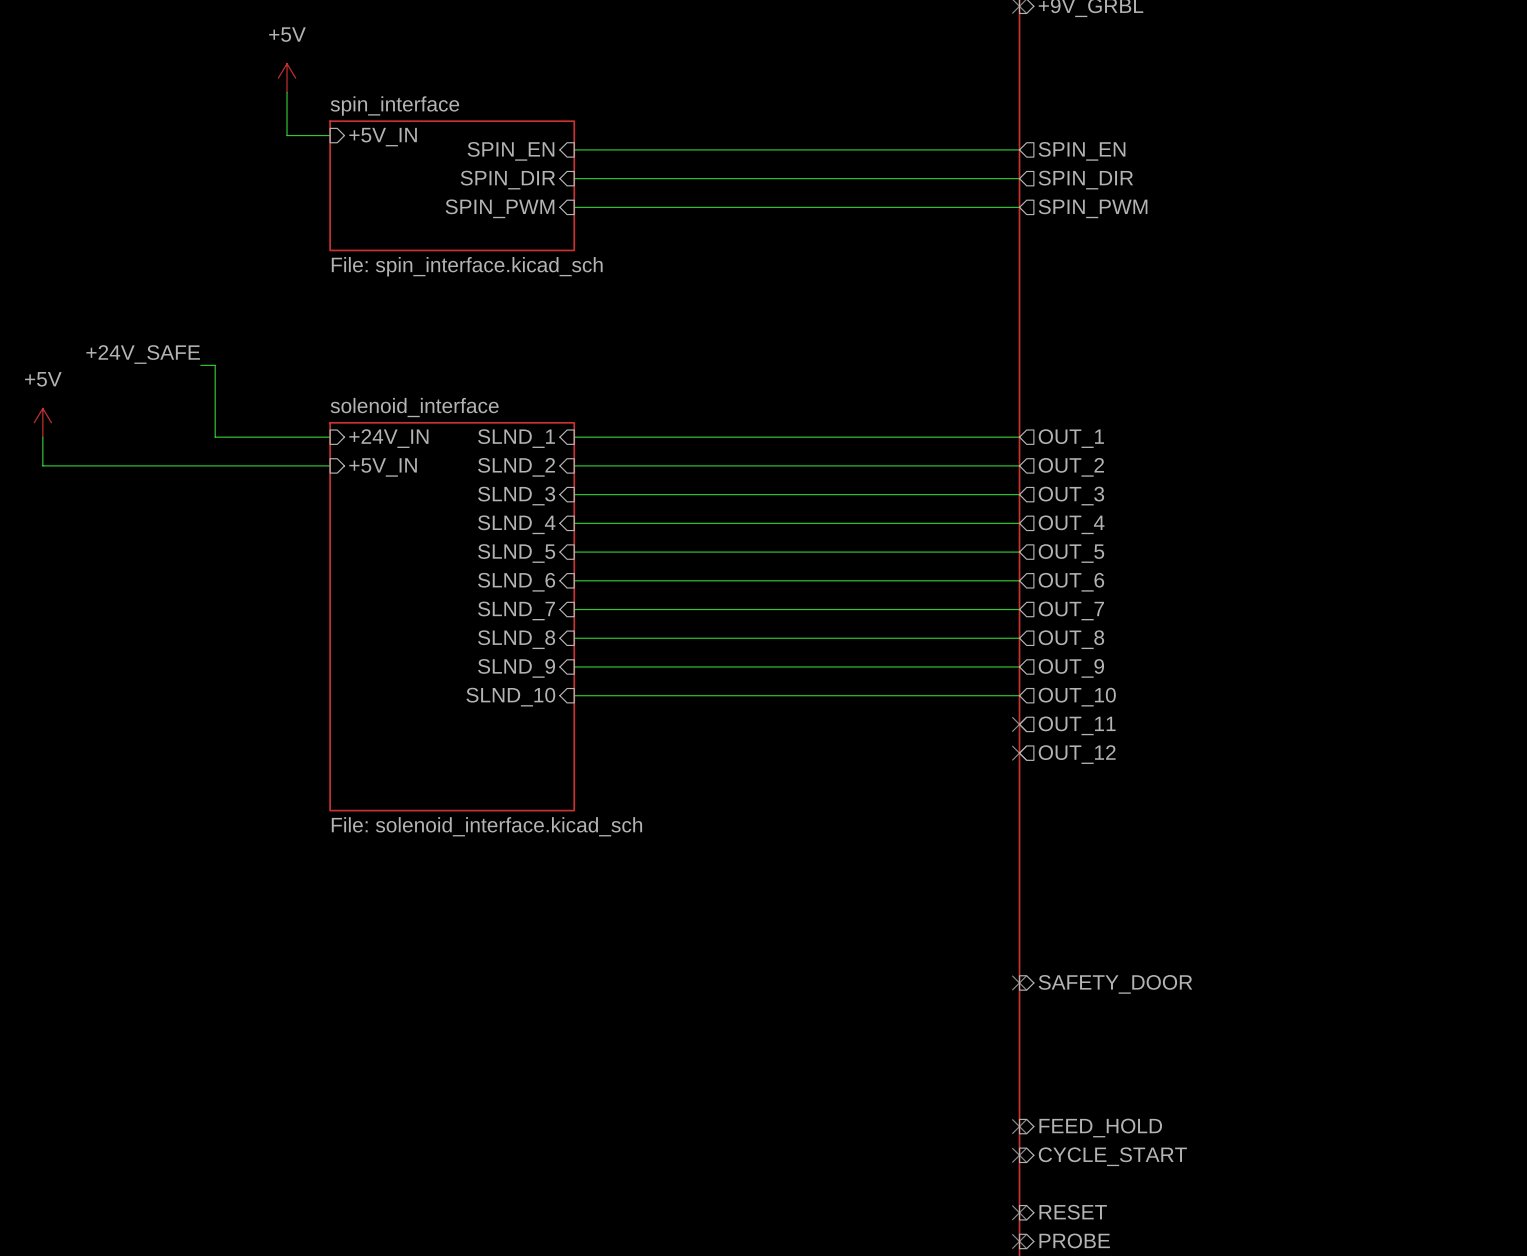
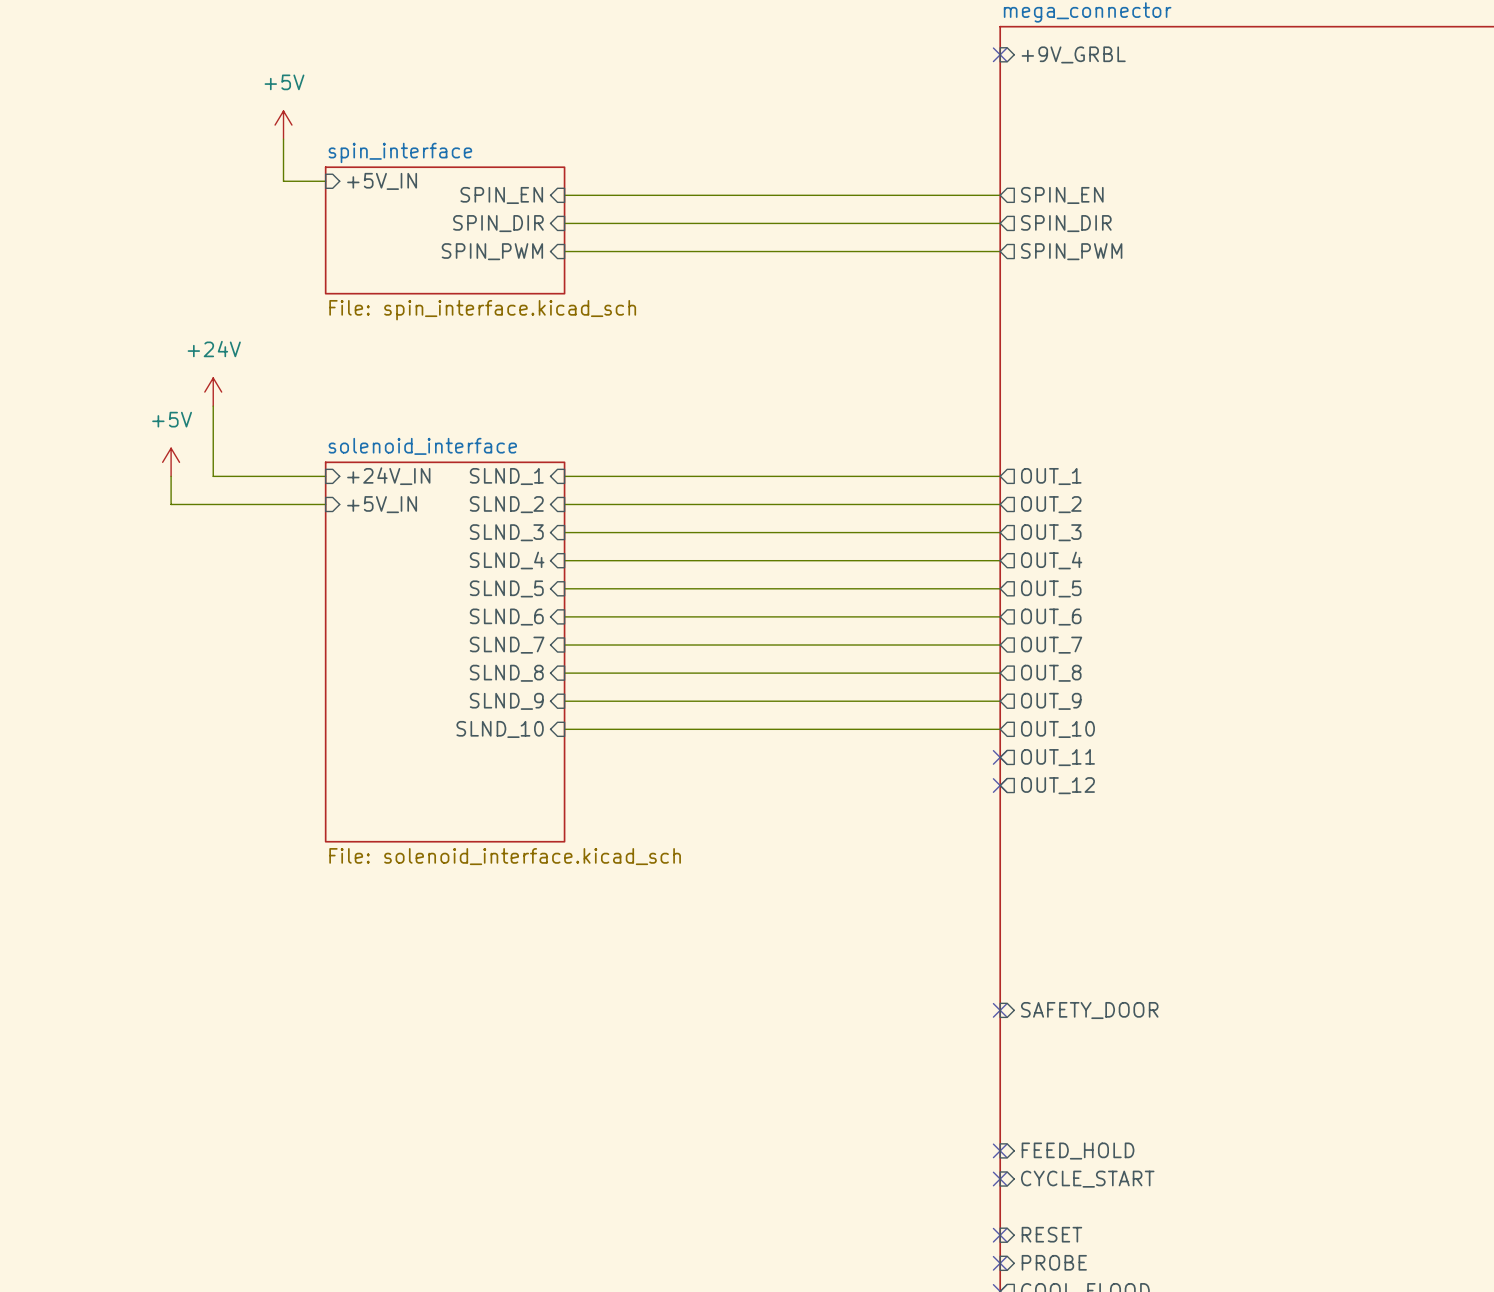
power symbol: none -> +24V (213, 392)
label: +24V_SAFE (143, 354) -> none
wire: (200, 365) (215, 365) -> none
power symbol position: +5V (42, 422) -> +5V (171, 462)
wire: (42, 437) (42, 465) (172, 465) -> (171, 476) (171, 504)

